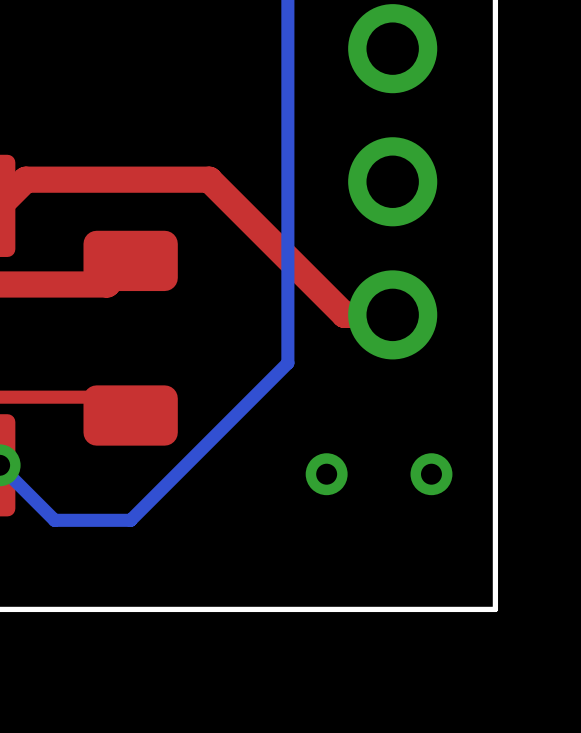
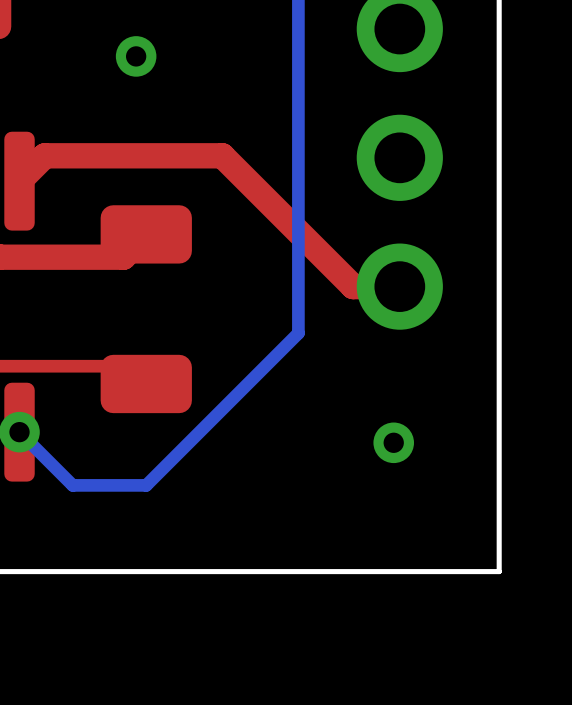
via: none -> (136, 56)
via: (326, 474) -> none
via: (431, 474) -> none
via: none -> (393, 442)

